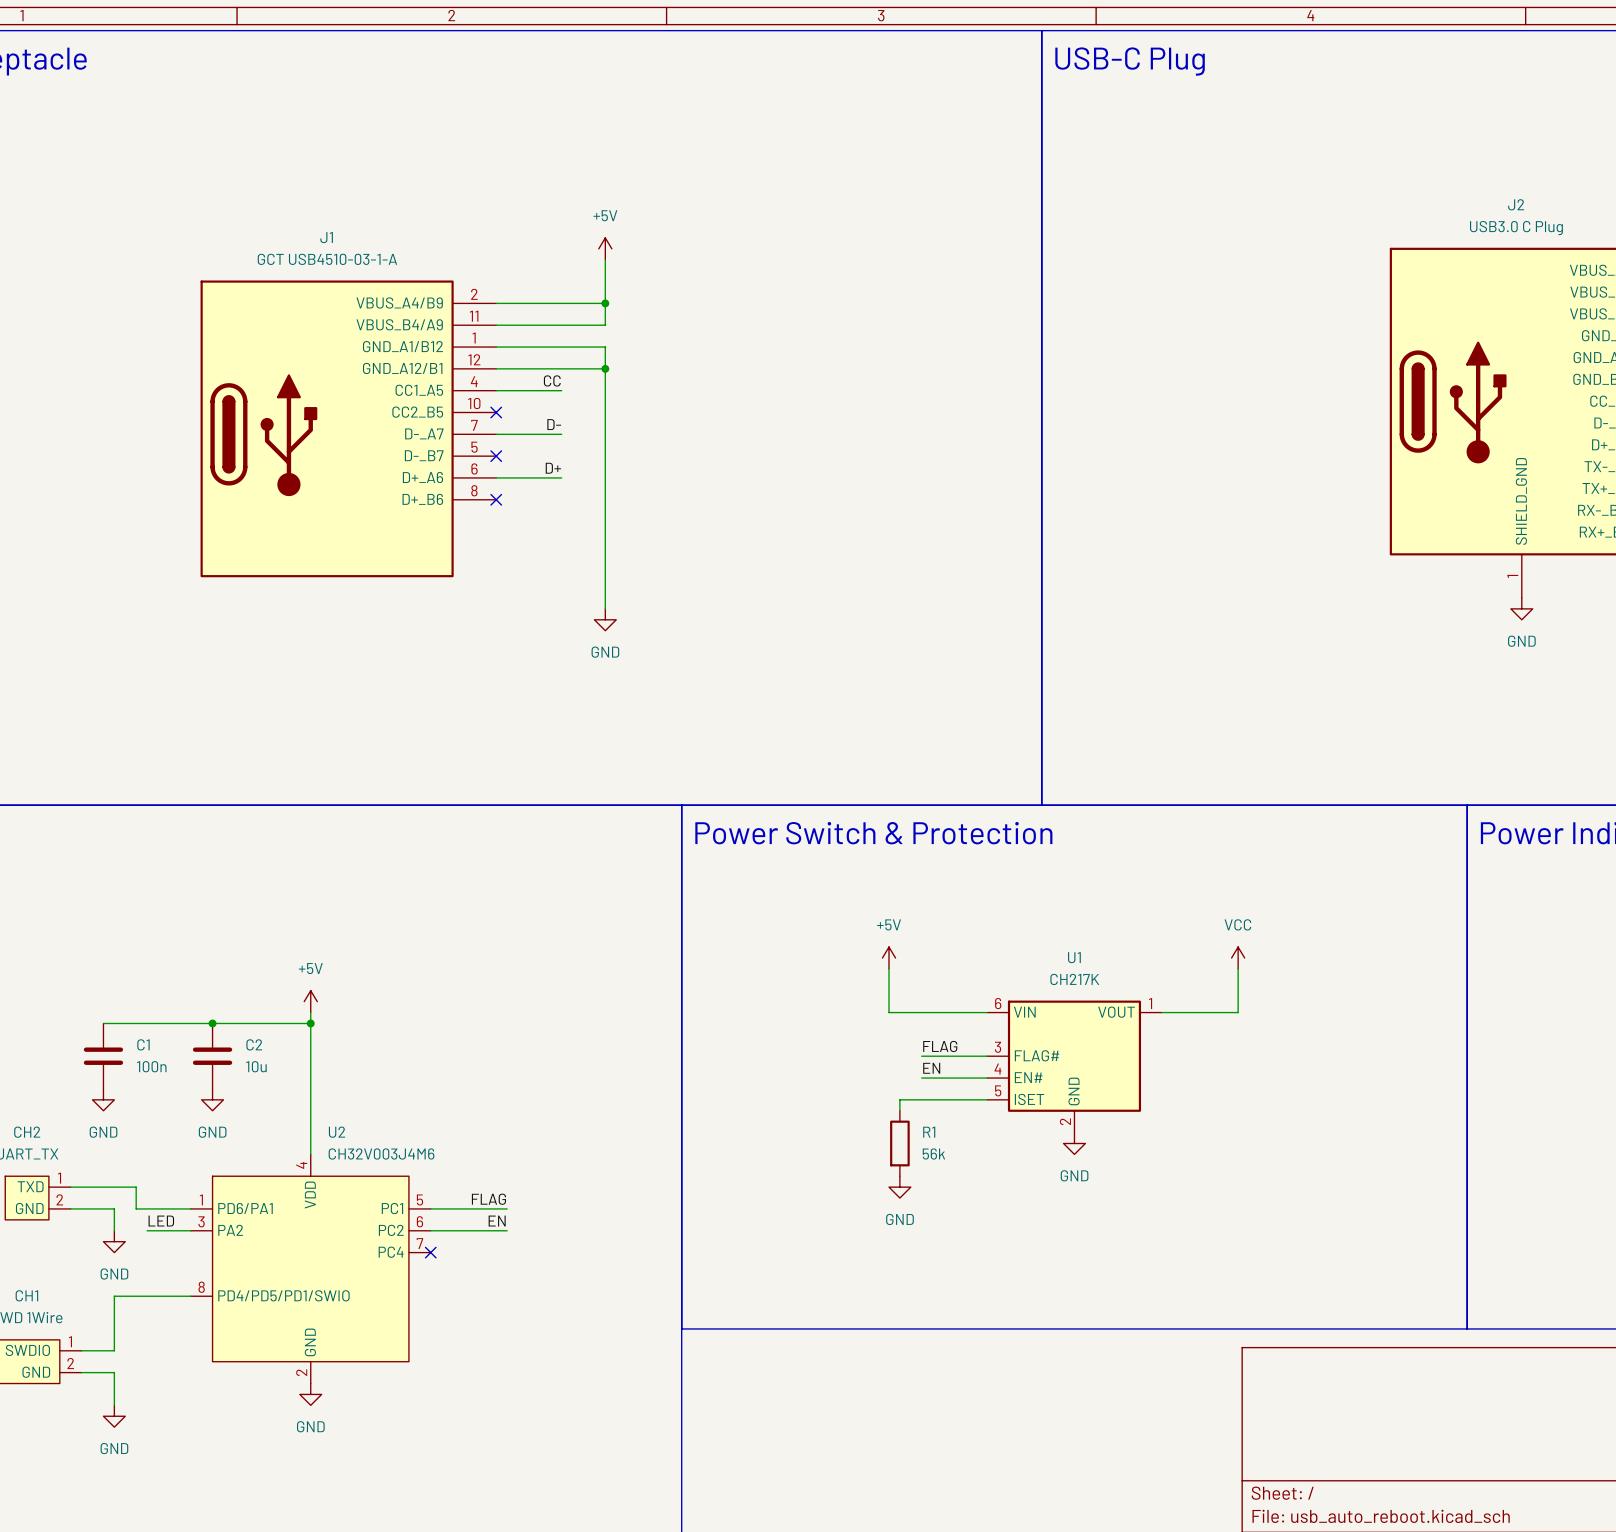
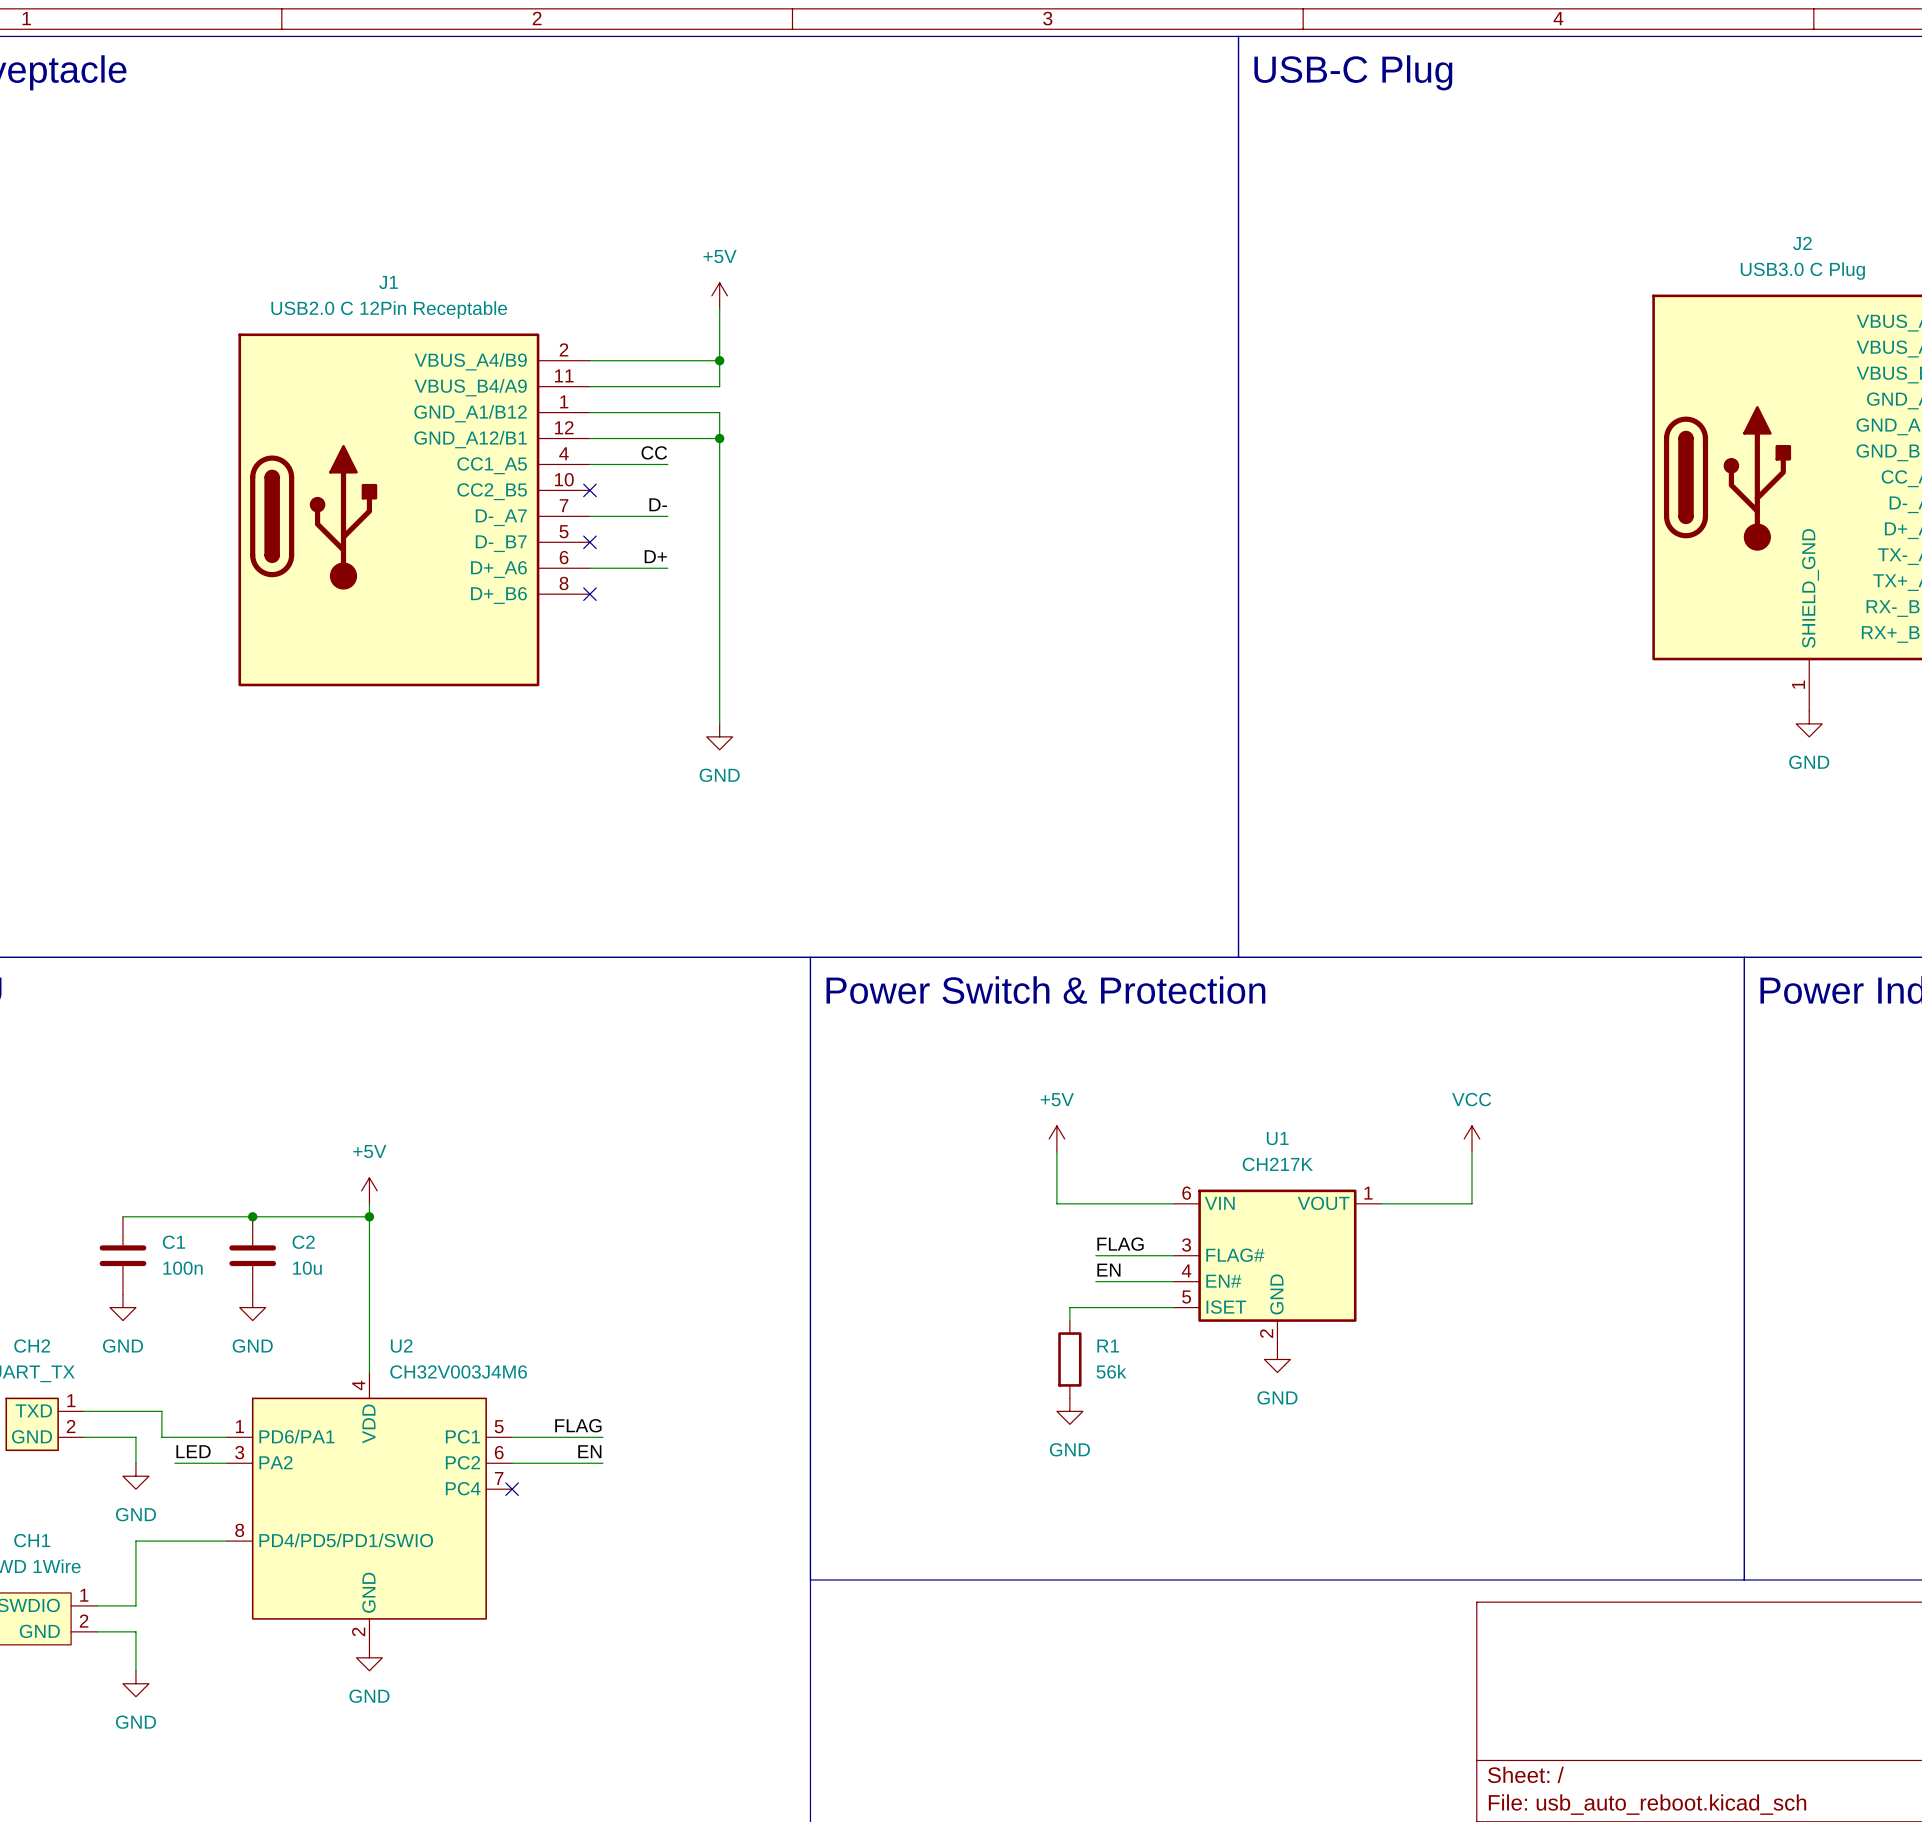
J1 value: GCT USB4510-03-1-A (327, 259) -> USB2.0 C 12Pin Receptable (389, 309)

